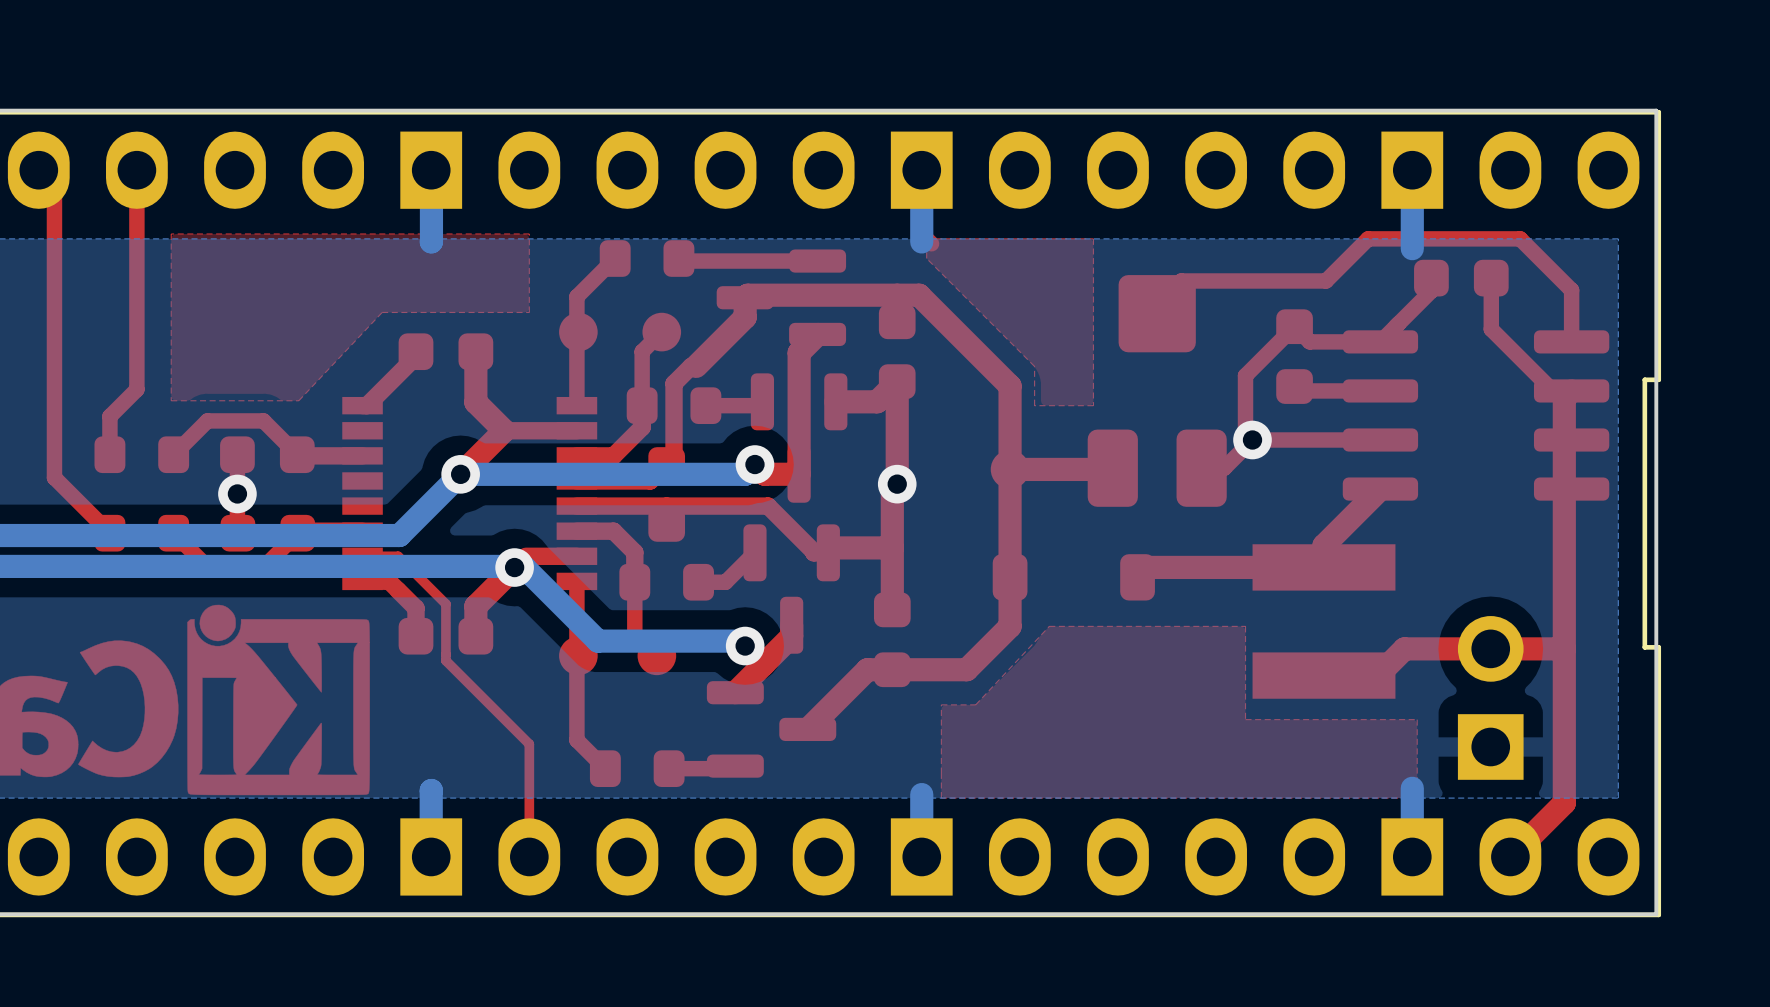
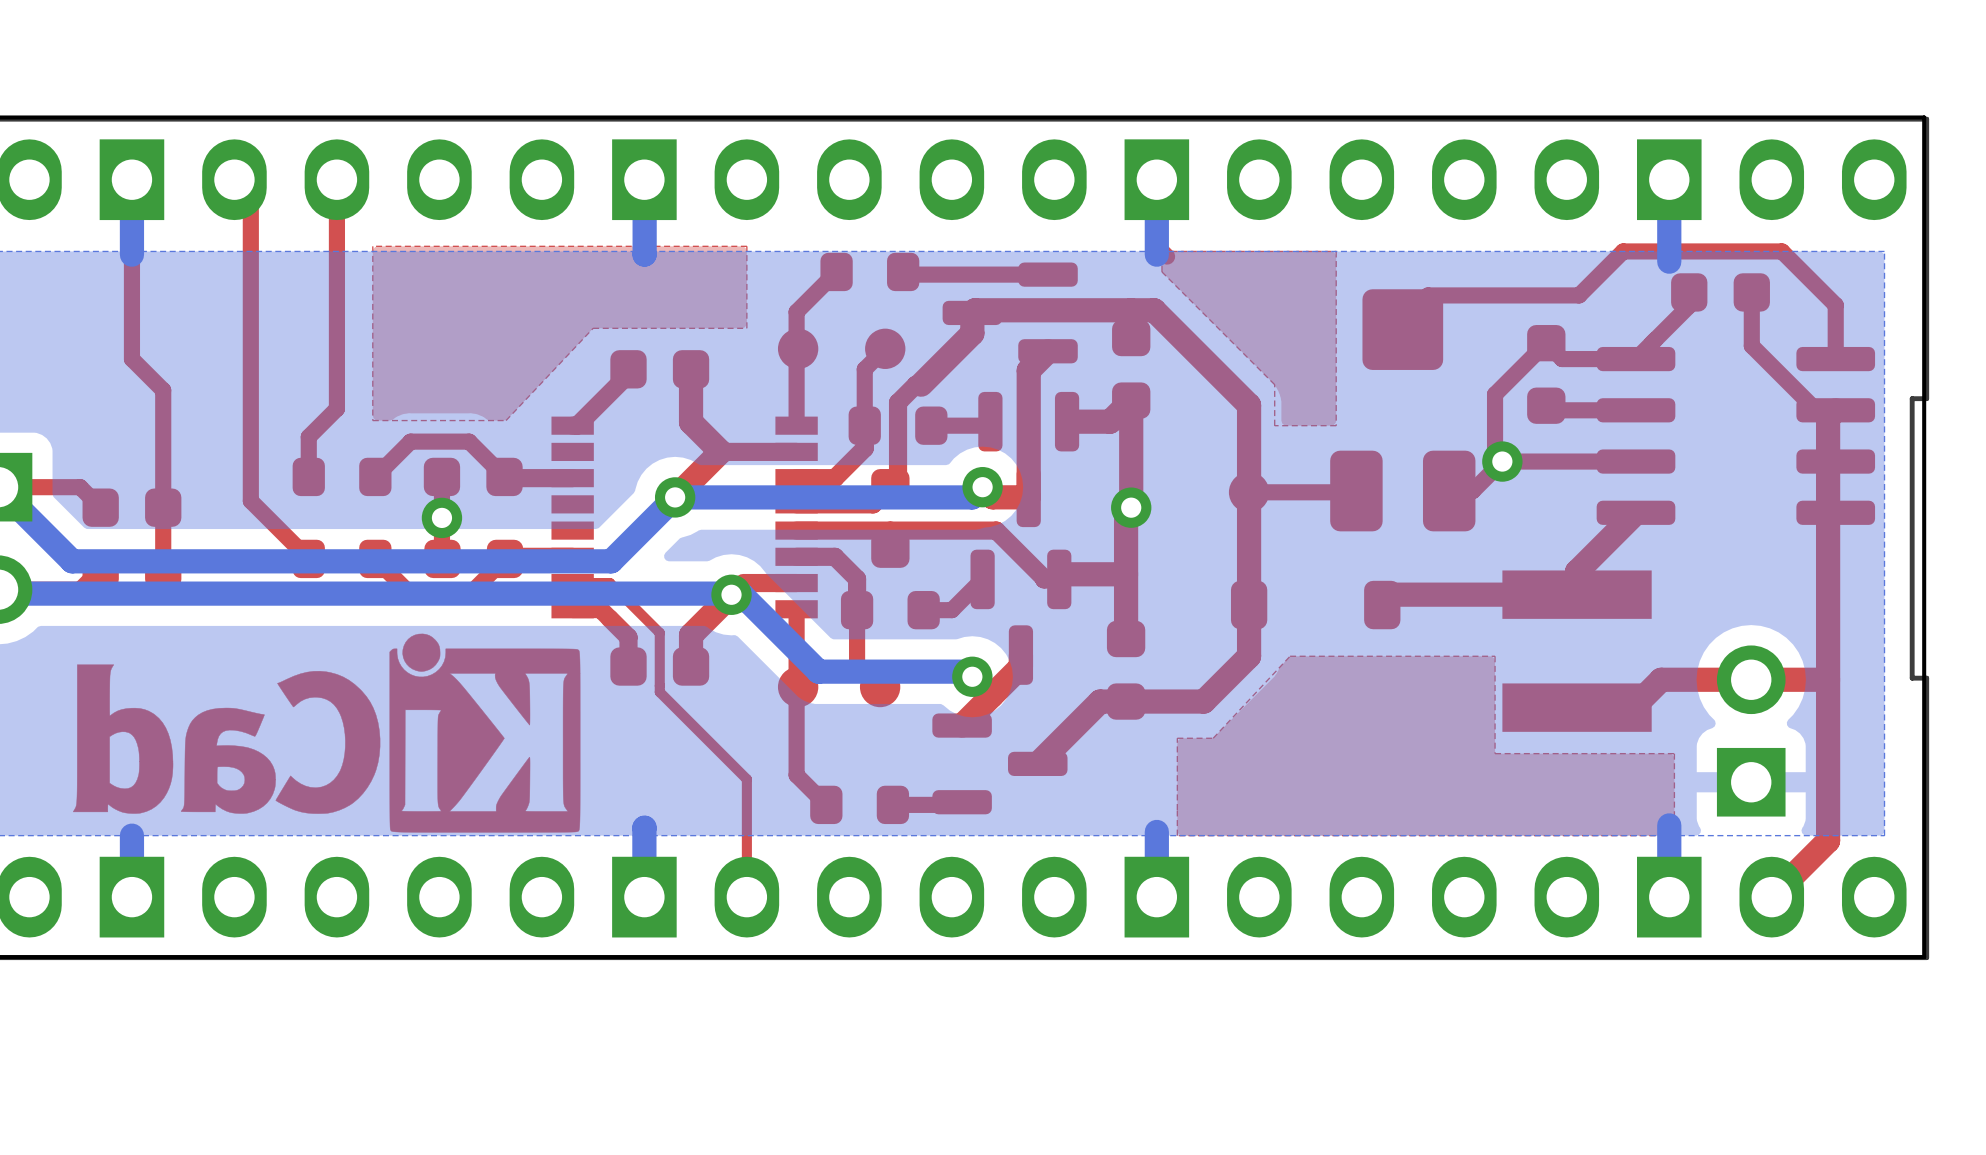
top track width: thick (1111, 469) (1010, 469) -> thin (1355, 492) (1249, 492)

